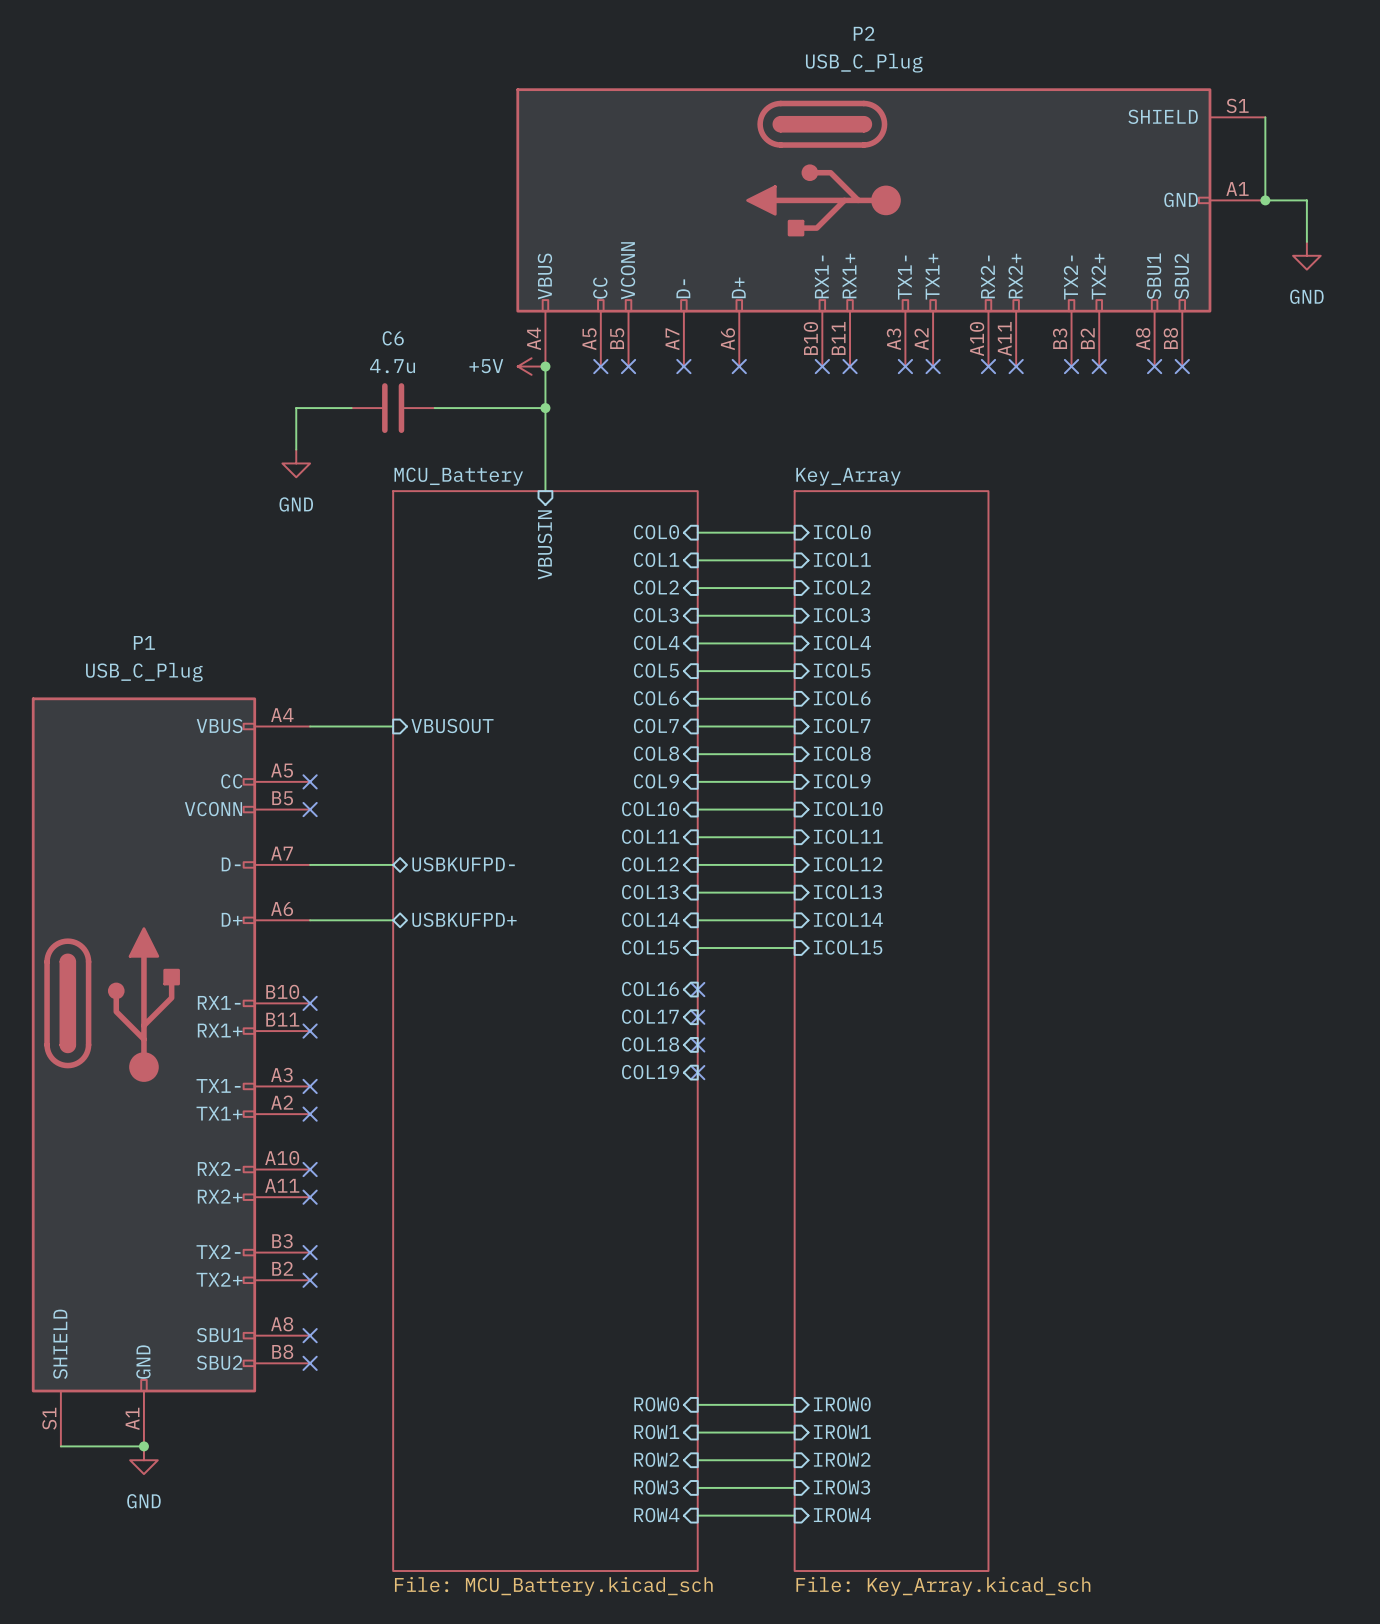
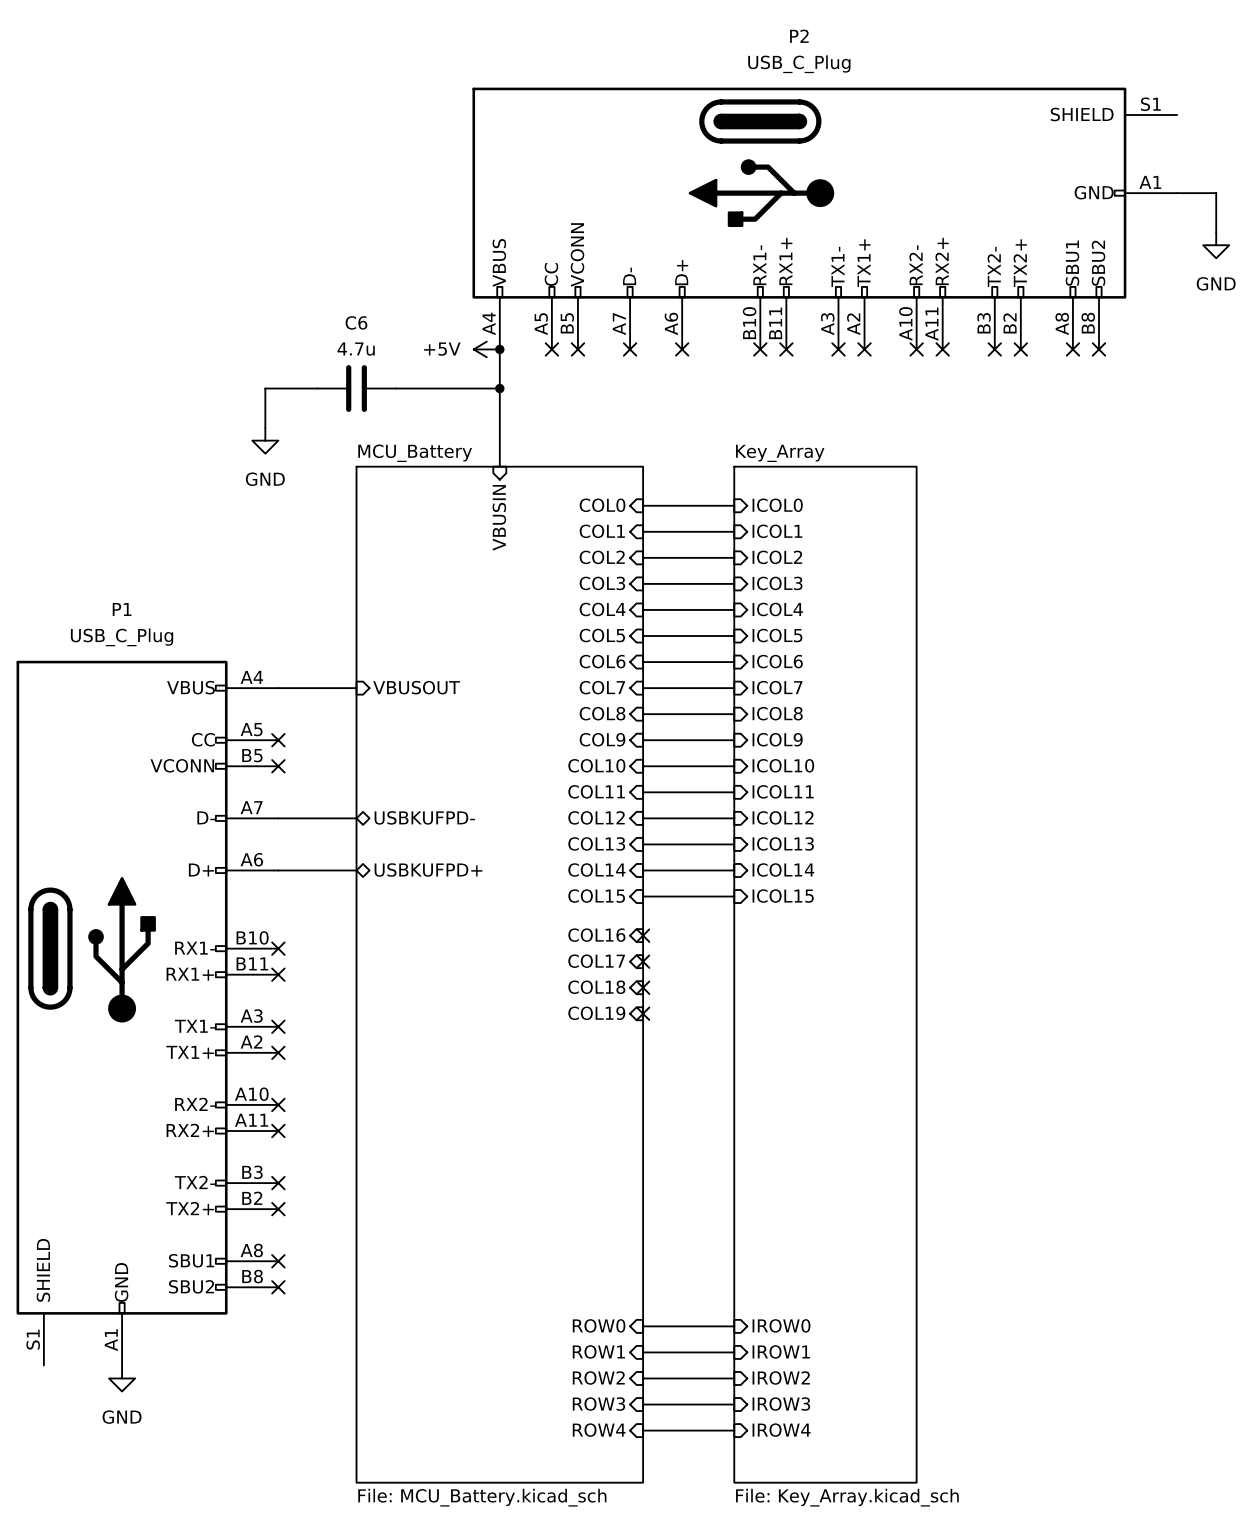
wire: (1265, 117) (1265, 200) -> none
junction: (1265, 200) -> none
wire: (60, 1446) (143, 1446) -> none
junction: (143, 1446) -> none

